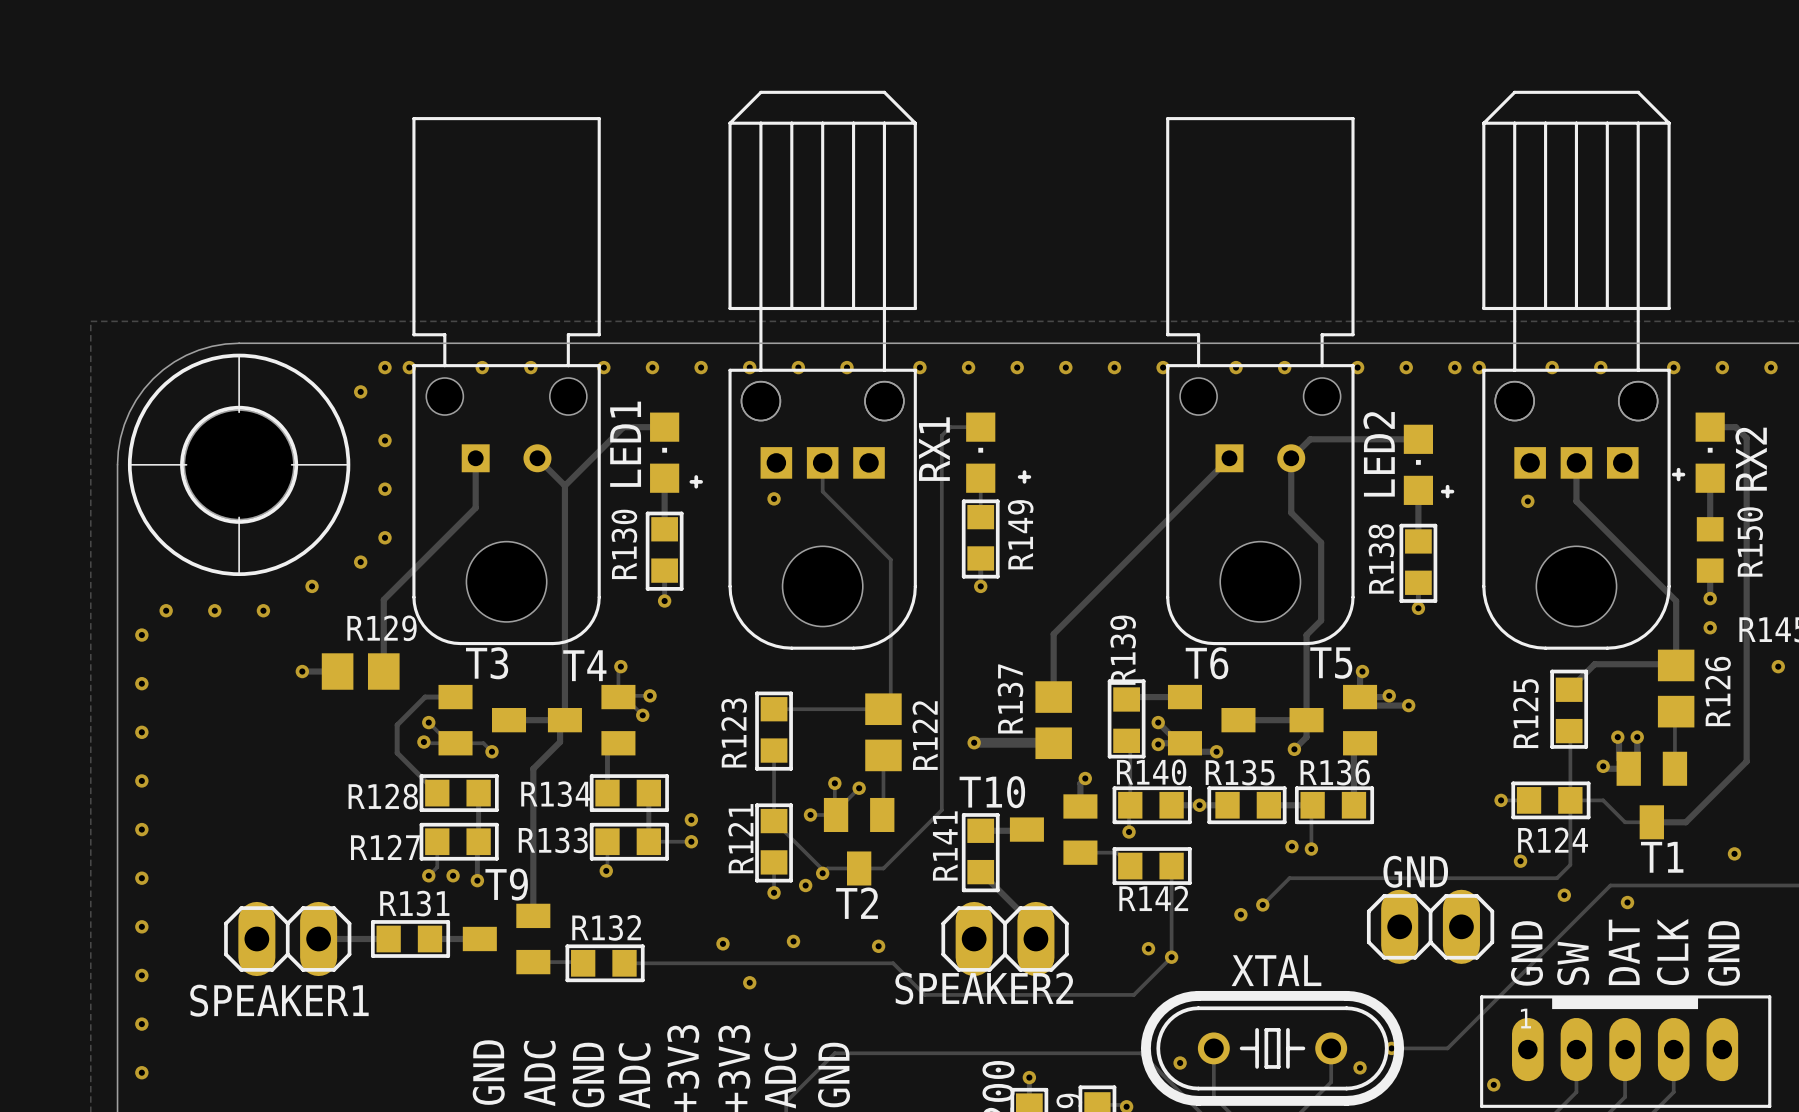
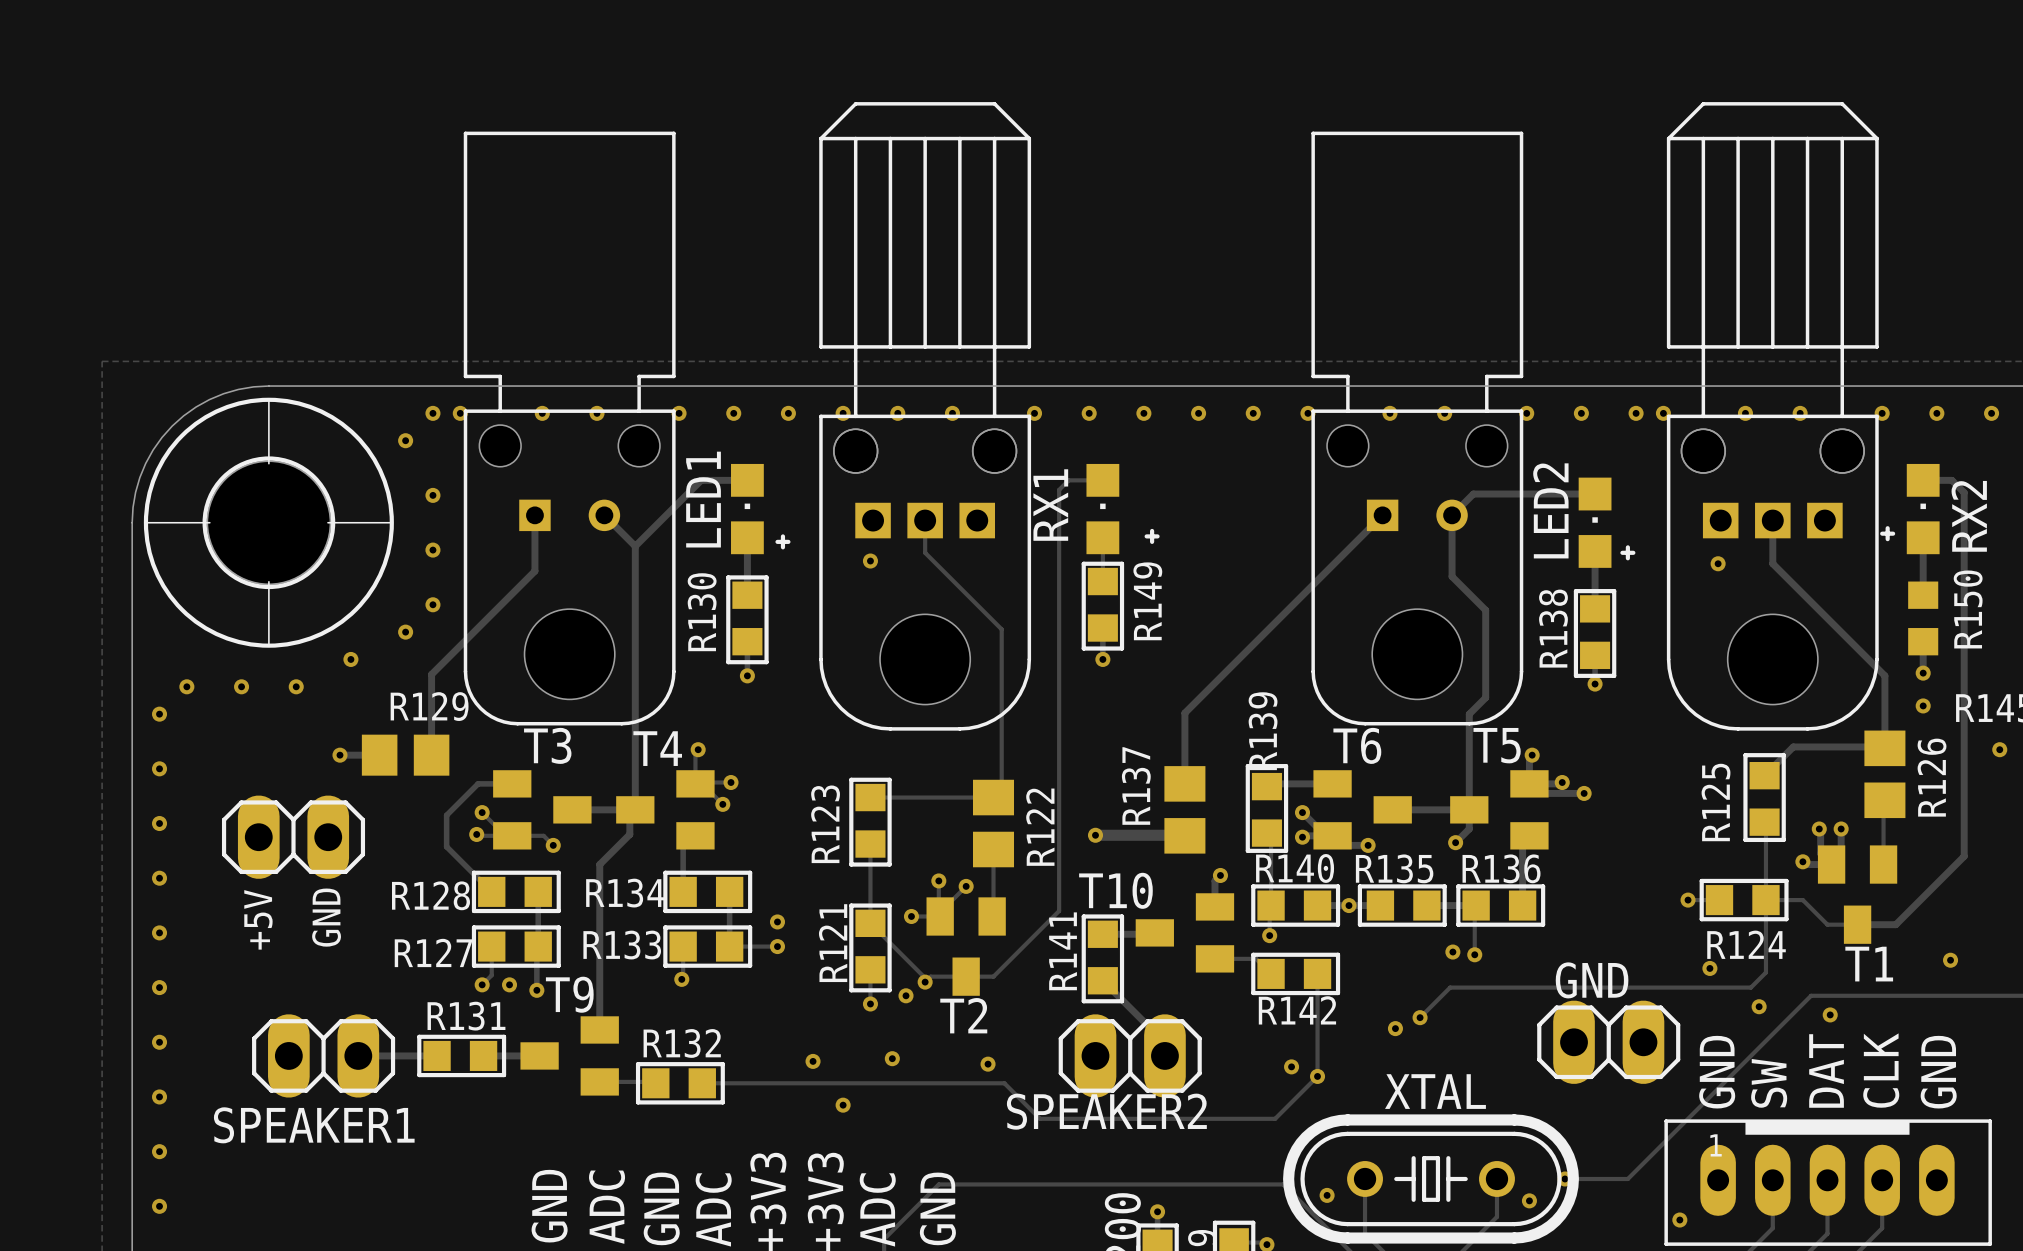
part: none -> (293, 837)
text: none -> GND (326, 917)
text: none -> +5V (258, 919)

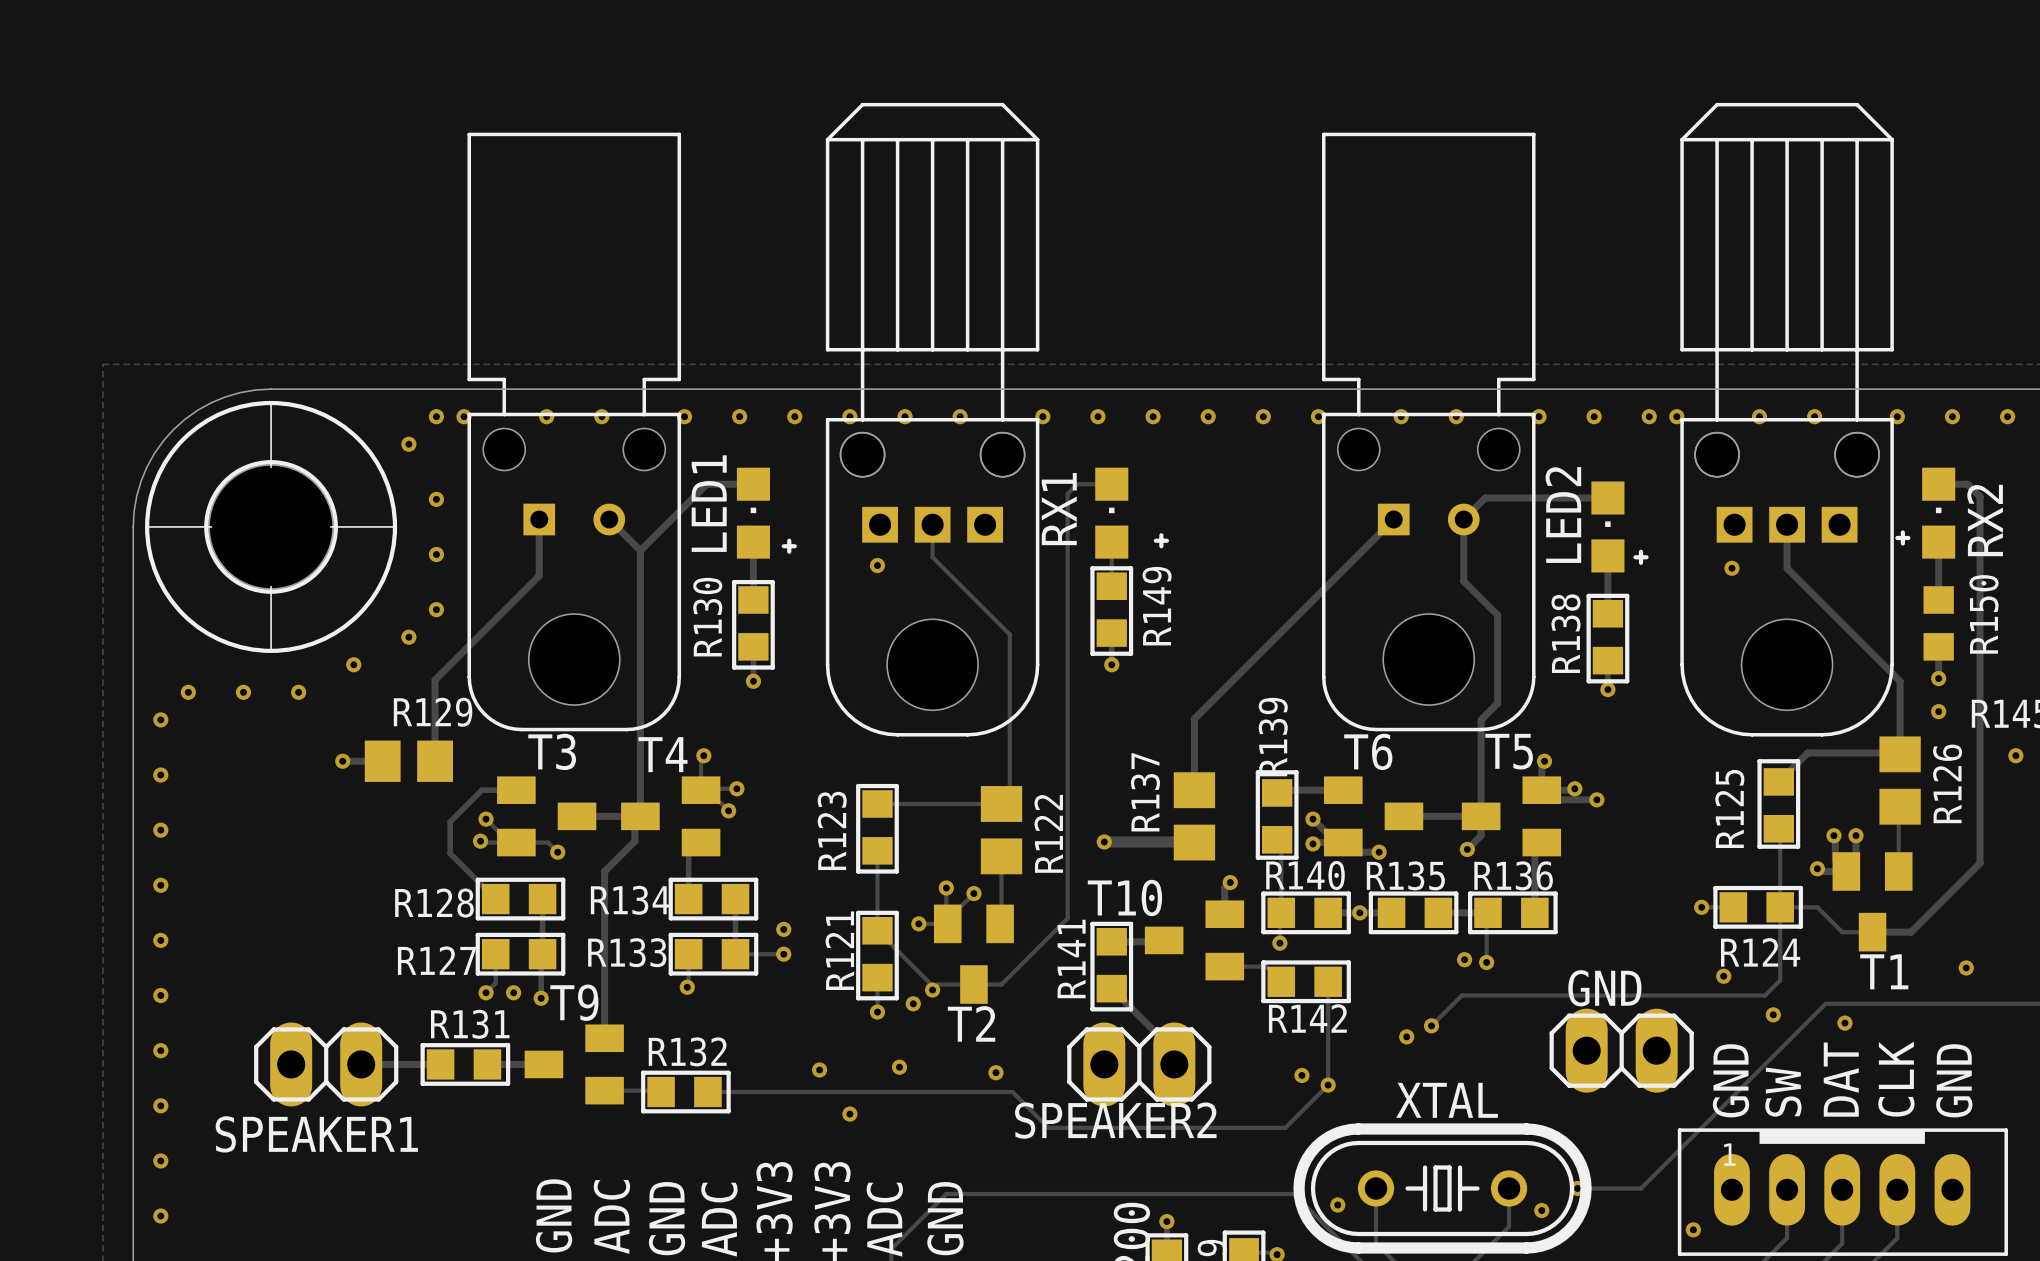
part: (293, 837) -> none
text: GND (326, 917) -> none
text: +5V (258, 919) -> none

